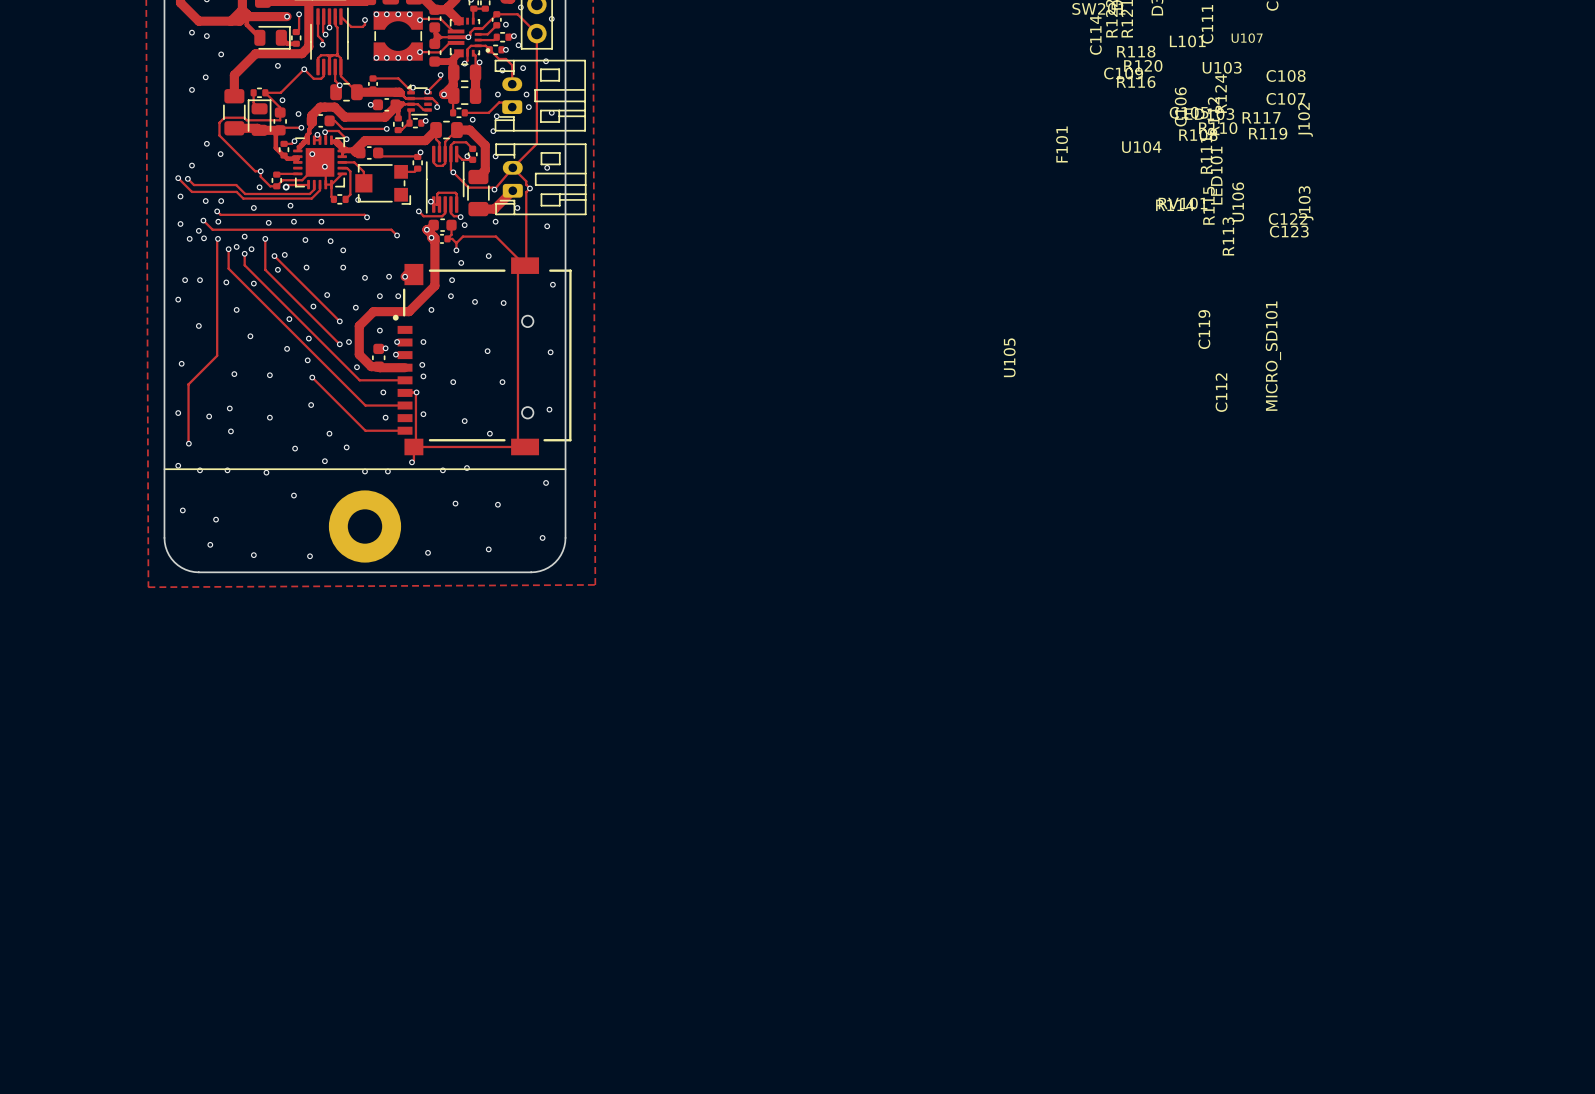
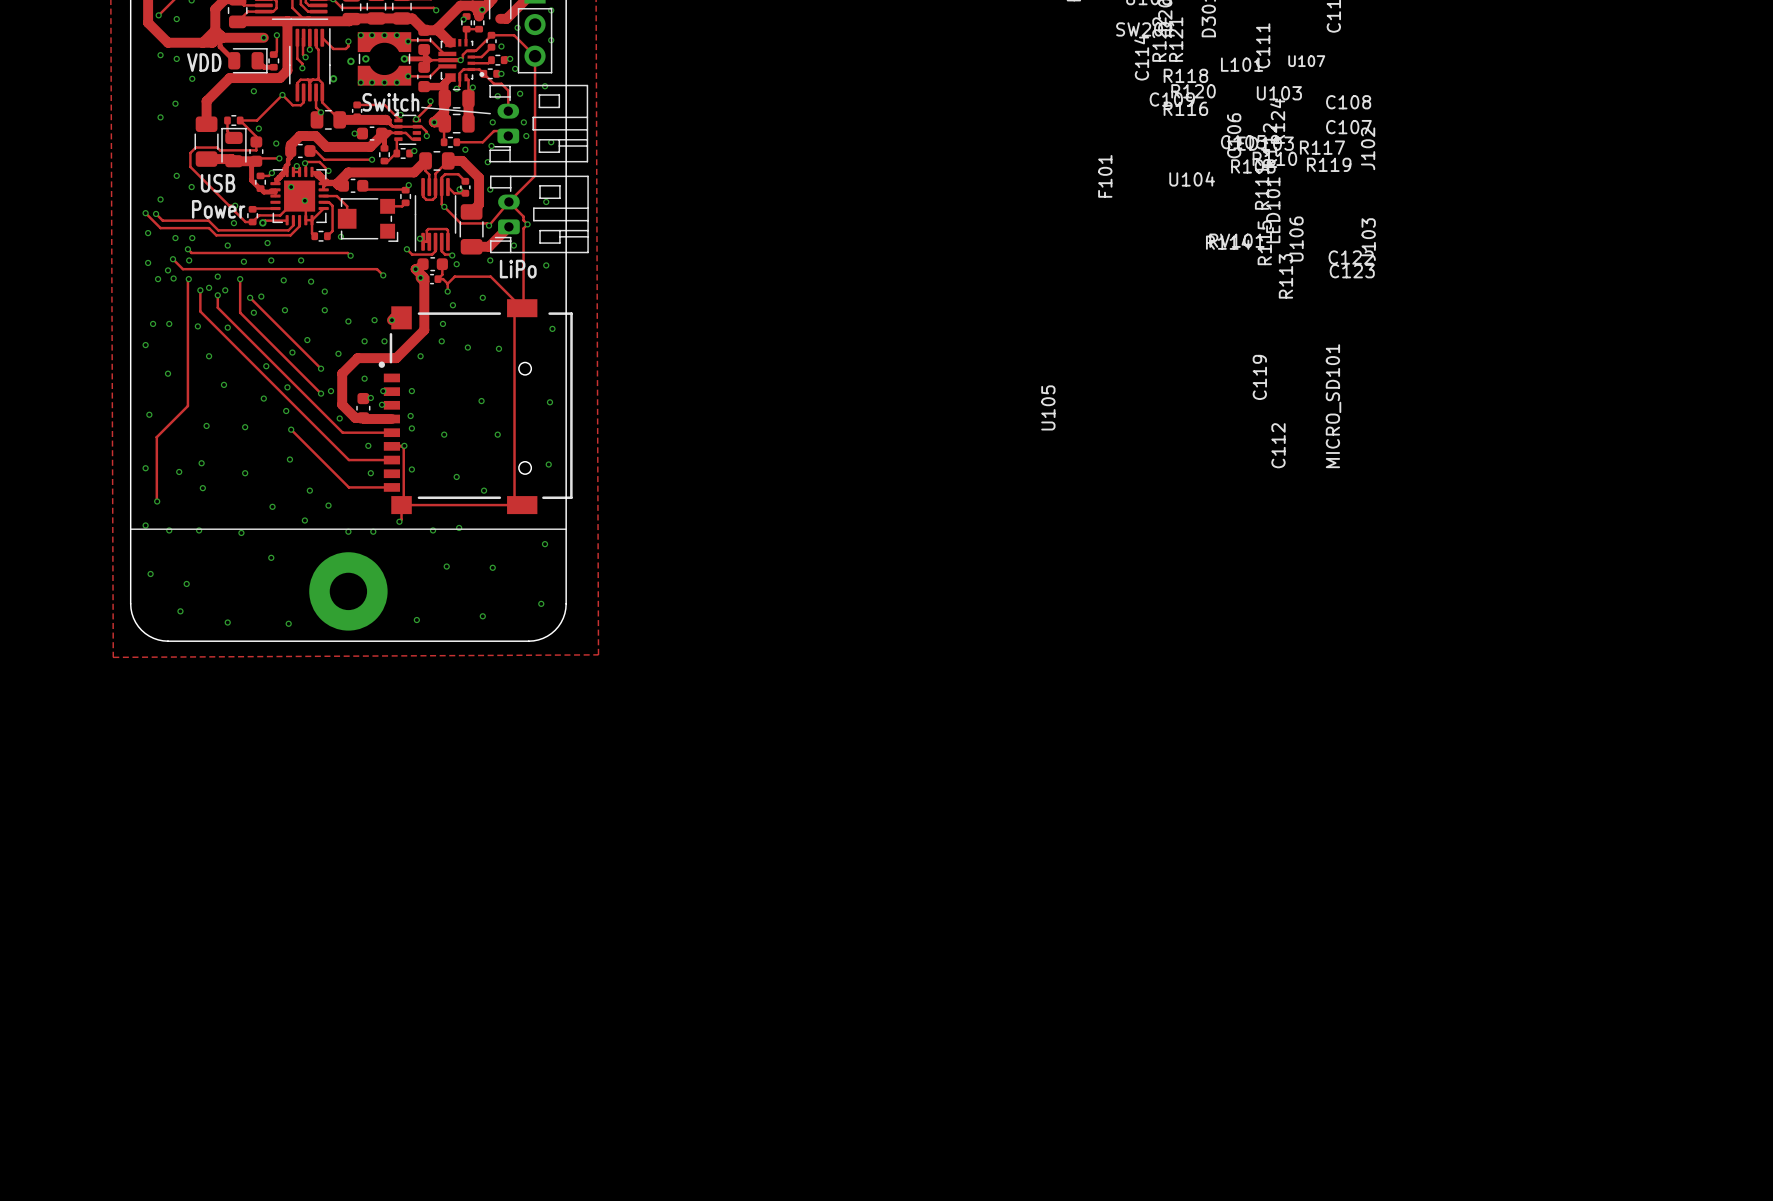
via: none -> (365, 58)
track: none -> (404, 58) (424, 58)
via: none -> (404, 58)
via: none -> (350, 61)
text: none -> VDD (204, 62)
via: none -> (333, 78)
text: none -> Switch (390, 102)
line: none -> (421, 107) (490, 113)
text: none -> USB (218, 183)
text: none -> Power (218, 209)
text: none -> LiPo (518, 269)

